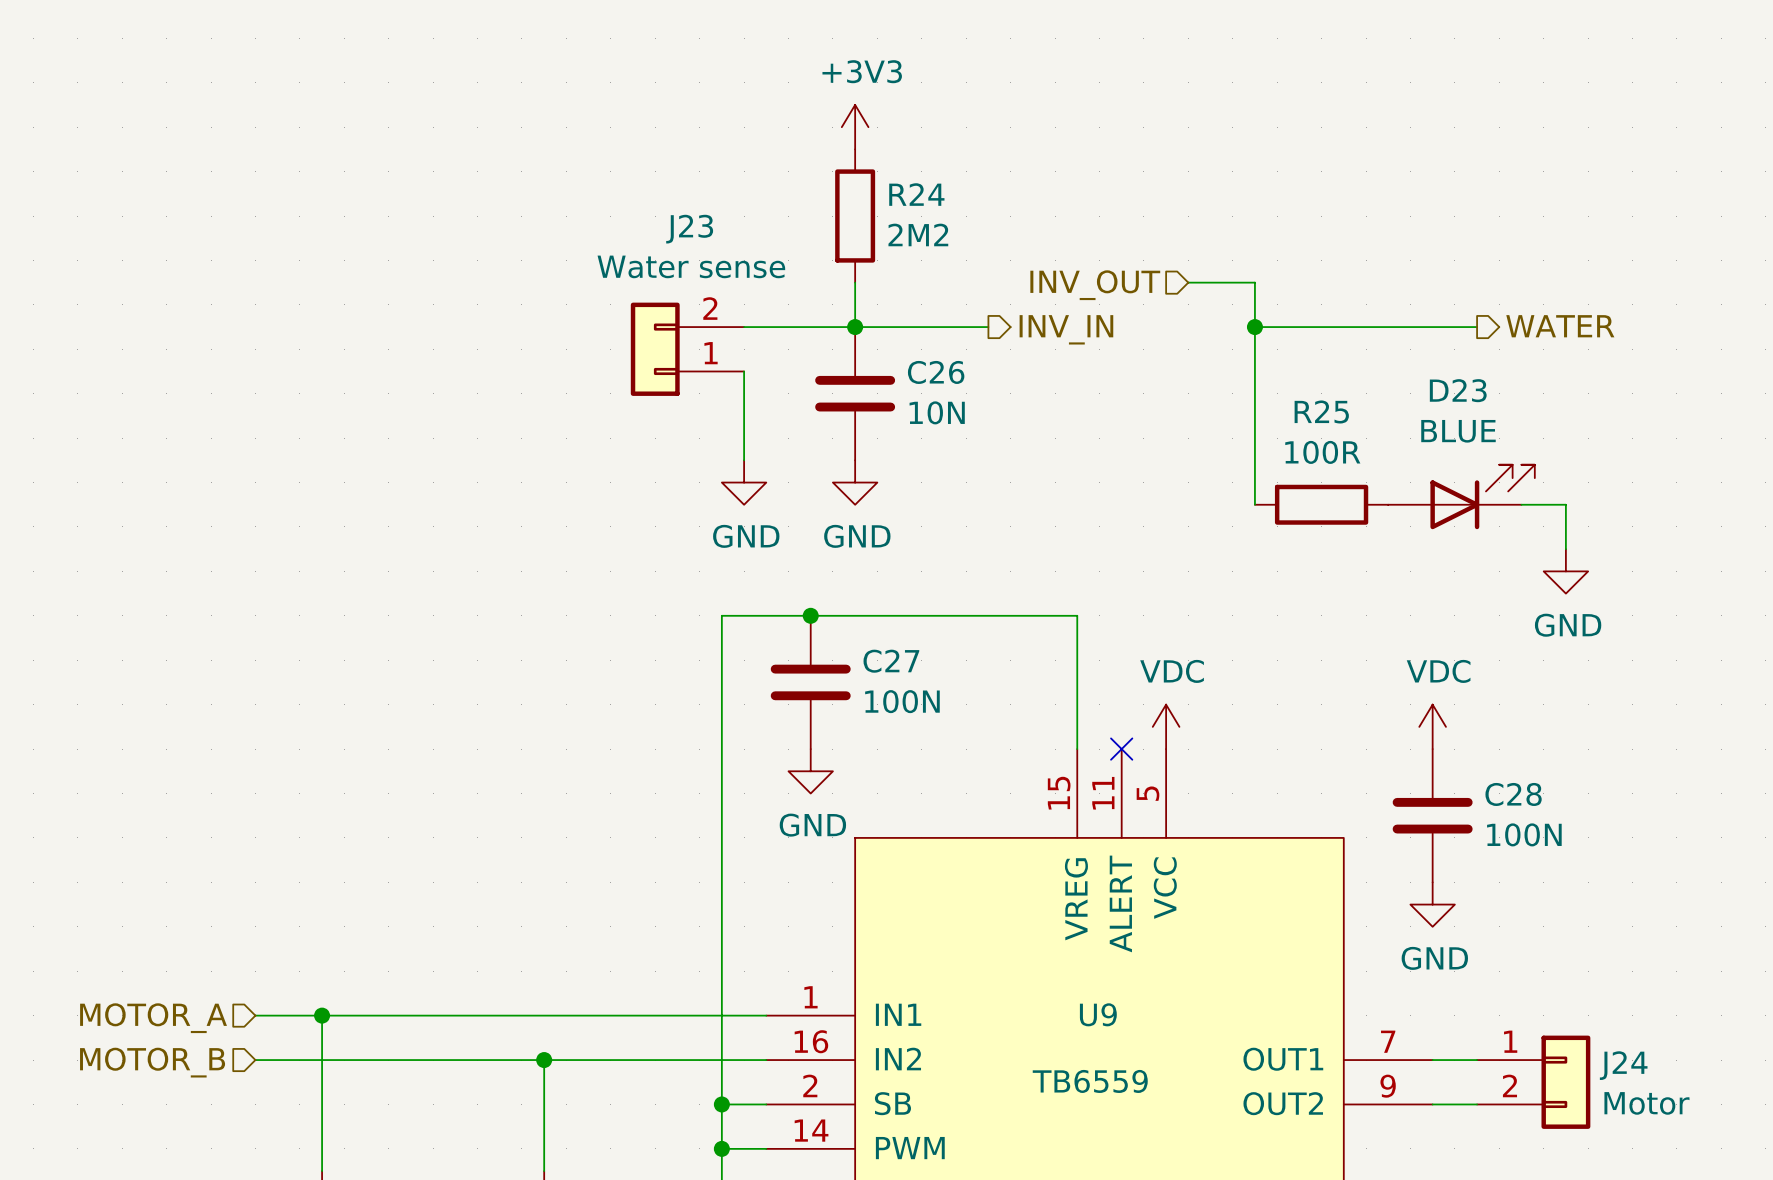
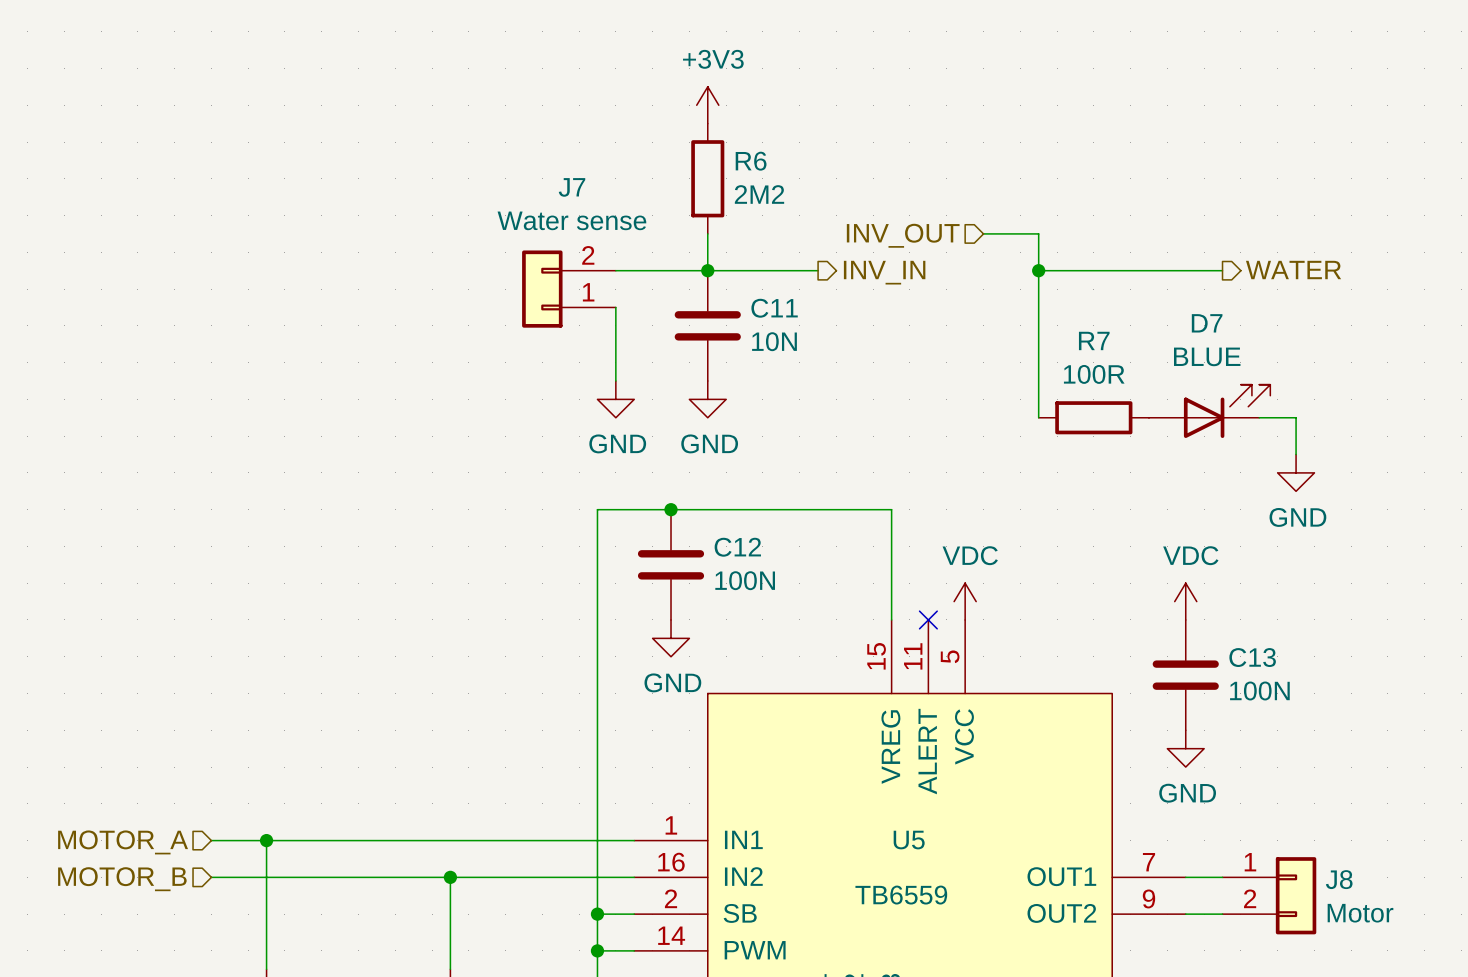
R24 name: R24 (916, 194) -> R6 (751, 161)
J23 name: J23 (689, 229) -> J7 (572, 187)
C26 name: C26 (936, 372) -> C11 (774, 308)
D23 name: D23 (1458, 390) -> D7 (1207, 323)
R25 name: R25 (1321, 411) -> R7 (1094, 340)
C27 name: C27 (891, 661) -> C12 (737, 547)
C28 name: C28 (1513, 794) -> C13 (1252, 657)
U9 name: U9 (1098, 1014) -> U5 (909, 840)
J24 name: J24 (1623, 1065) -> J8 (1339, 879)

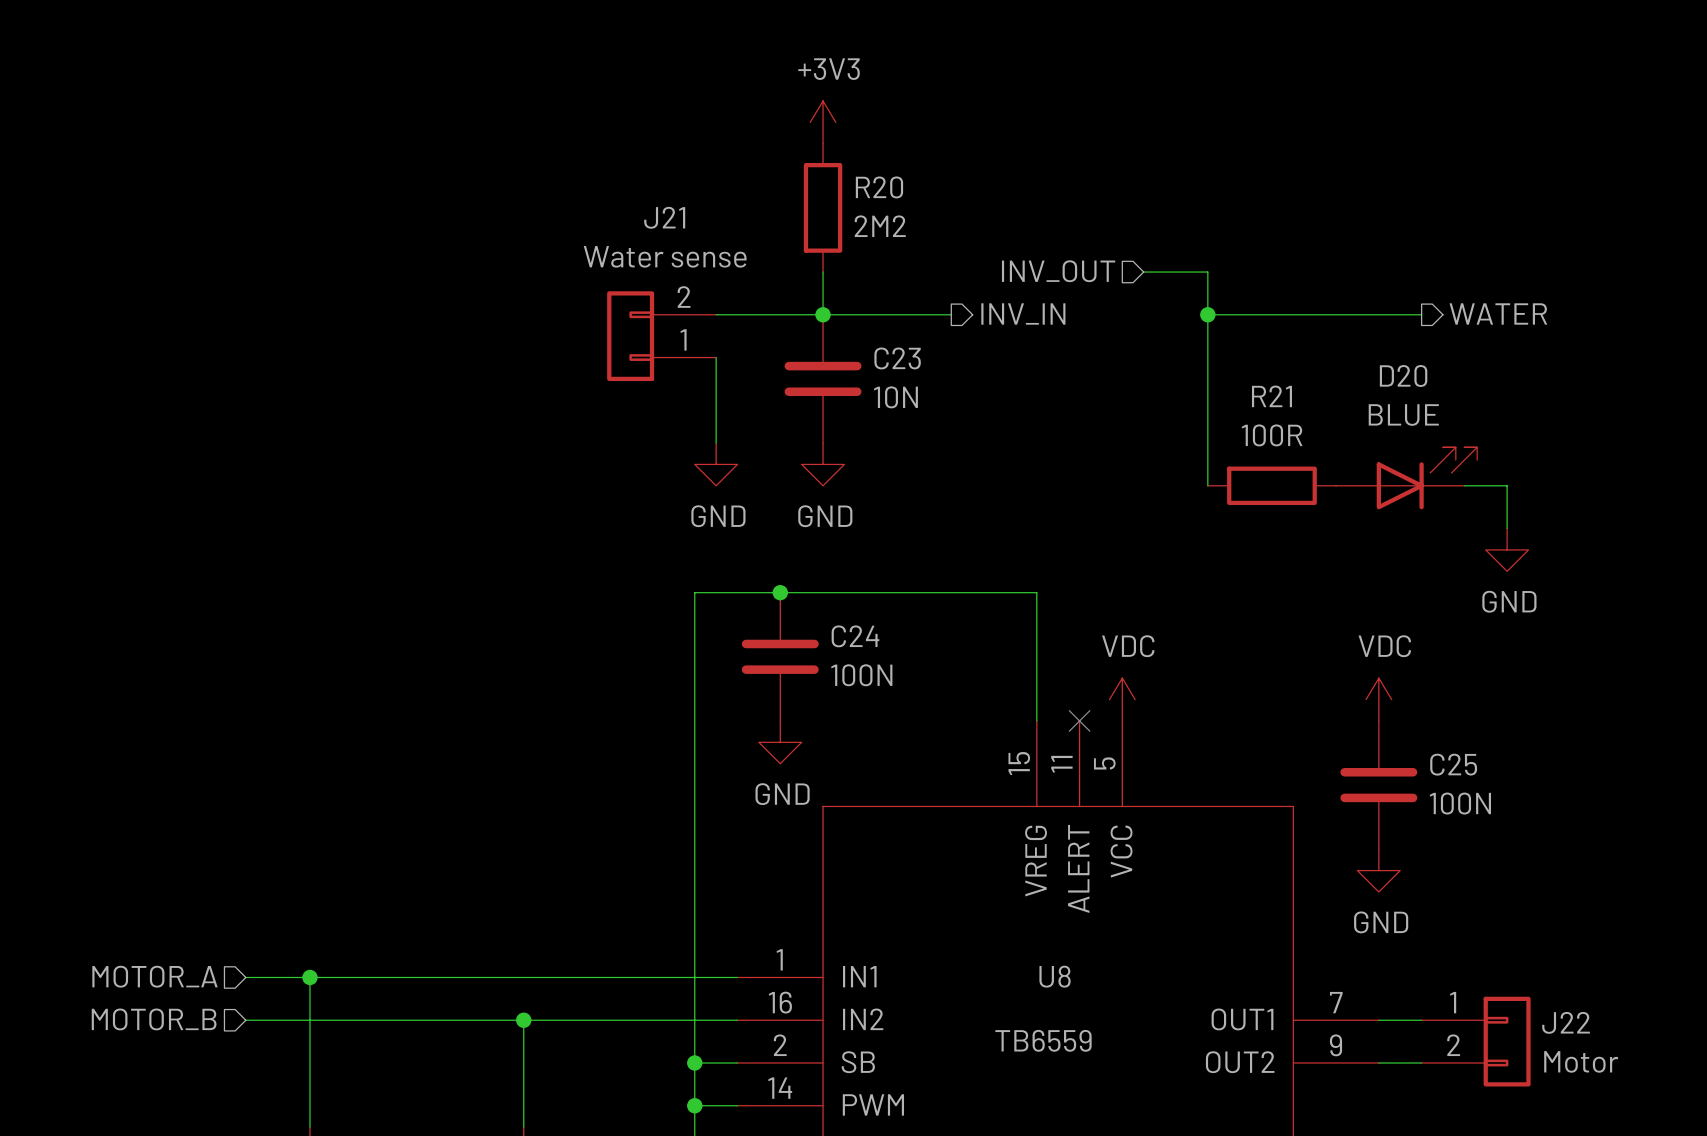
R6 name: R6 (751, 161) -> R20 (879, 187)
J7 name: J7 (572, 187) -> J21 (664, 217)
C11 name: C11 (774, 308) -> C23 (897, 358)
D7 name: D7 (1207, 323) -> D20 (1403, 375)
R7 name: R7 (1094, 340) -> R21 (1271, 396)
C12 name: C12 (737, 547) -> C24 (855, 636)
C13 name: C13 (1252, 657) -> C25 (1453, 764)
U5 name: U5 (909, 840) -> U8 (1055, 976)
J8 name: J8 (1339, 879) -> J22 (1566, 1022)

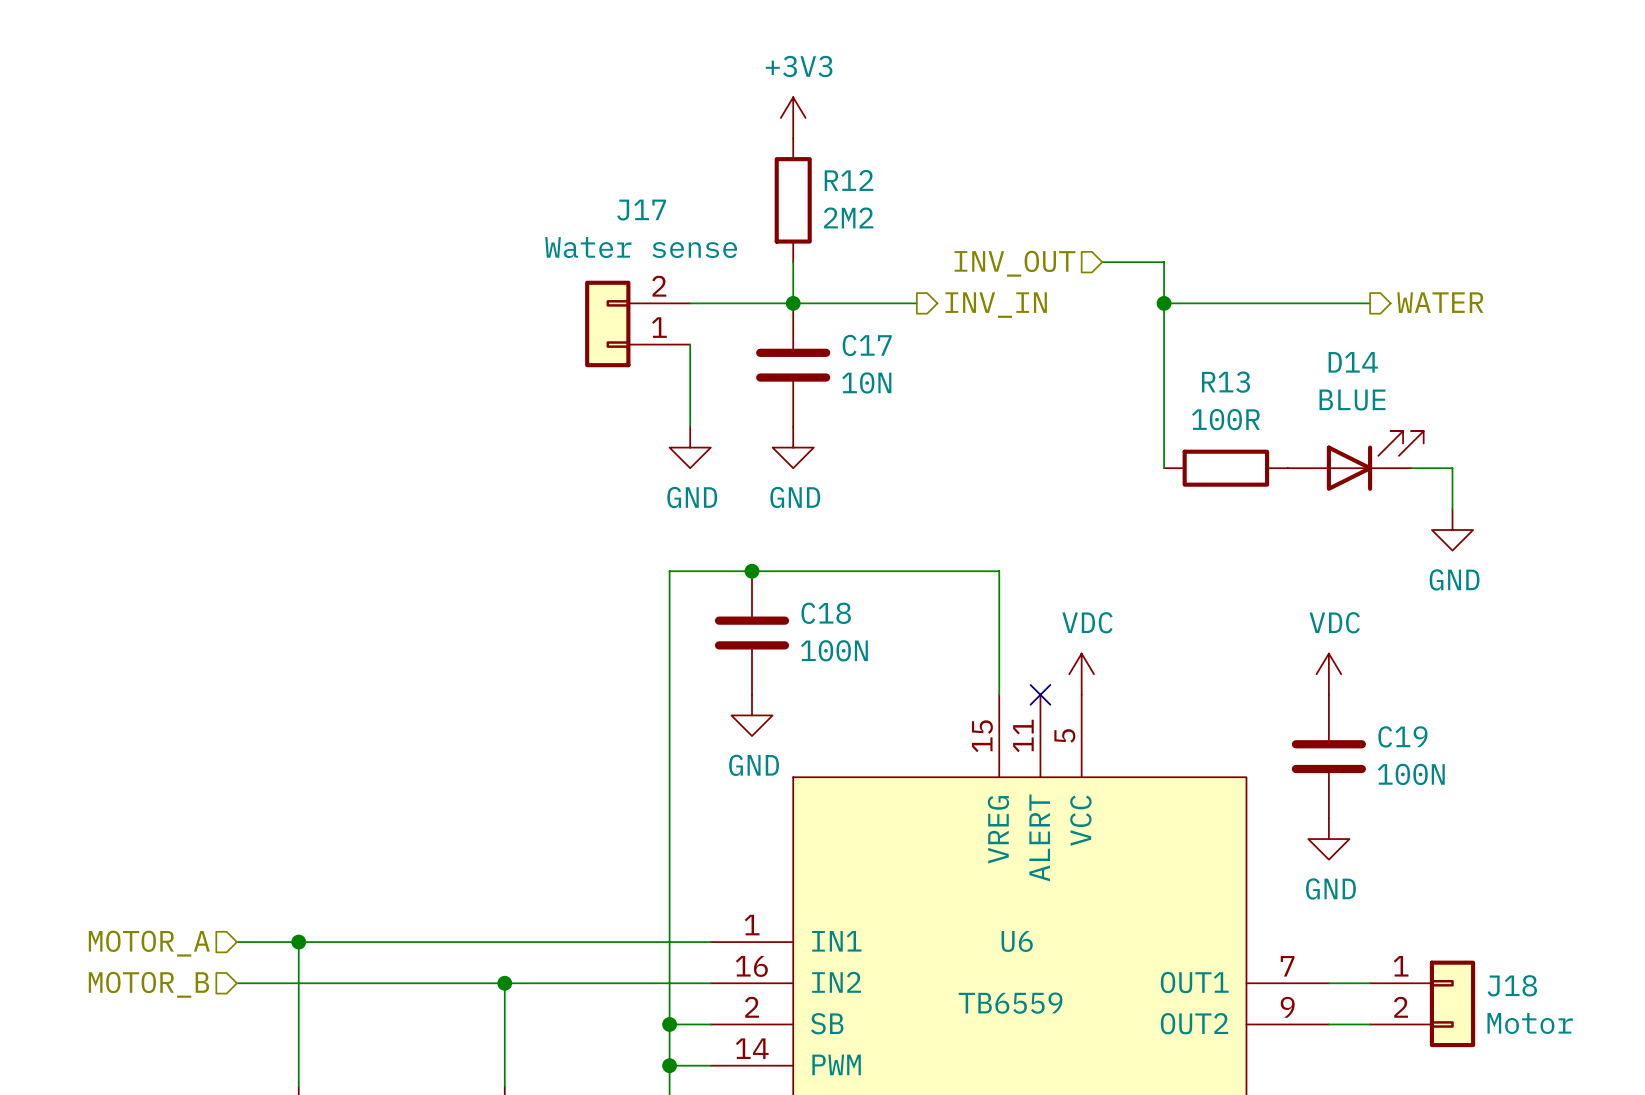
R20 name: R20 (879, 187) -> R12 (849, 180)
J21 name: J21 (664, 217) -> J17 (641, 210)
C23 name: C23 (897, 358) -> C17 (867, 345)
D20 name: D20 (1403, 375) -> D14 (1353, 362)
R21 name: R21 (1271, 396) -> R13 (1225, 382)
C24 name: C24 (855, 636) -> C18 (826, 613)
C25 name: C25 (1453, 764) -> C19 (1402, 736)
U8 name: U8 (1055, 976) -> U6 (1017, 941)
J22 name: J22 (1566, 1022) -> J18 (1512, 985)

